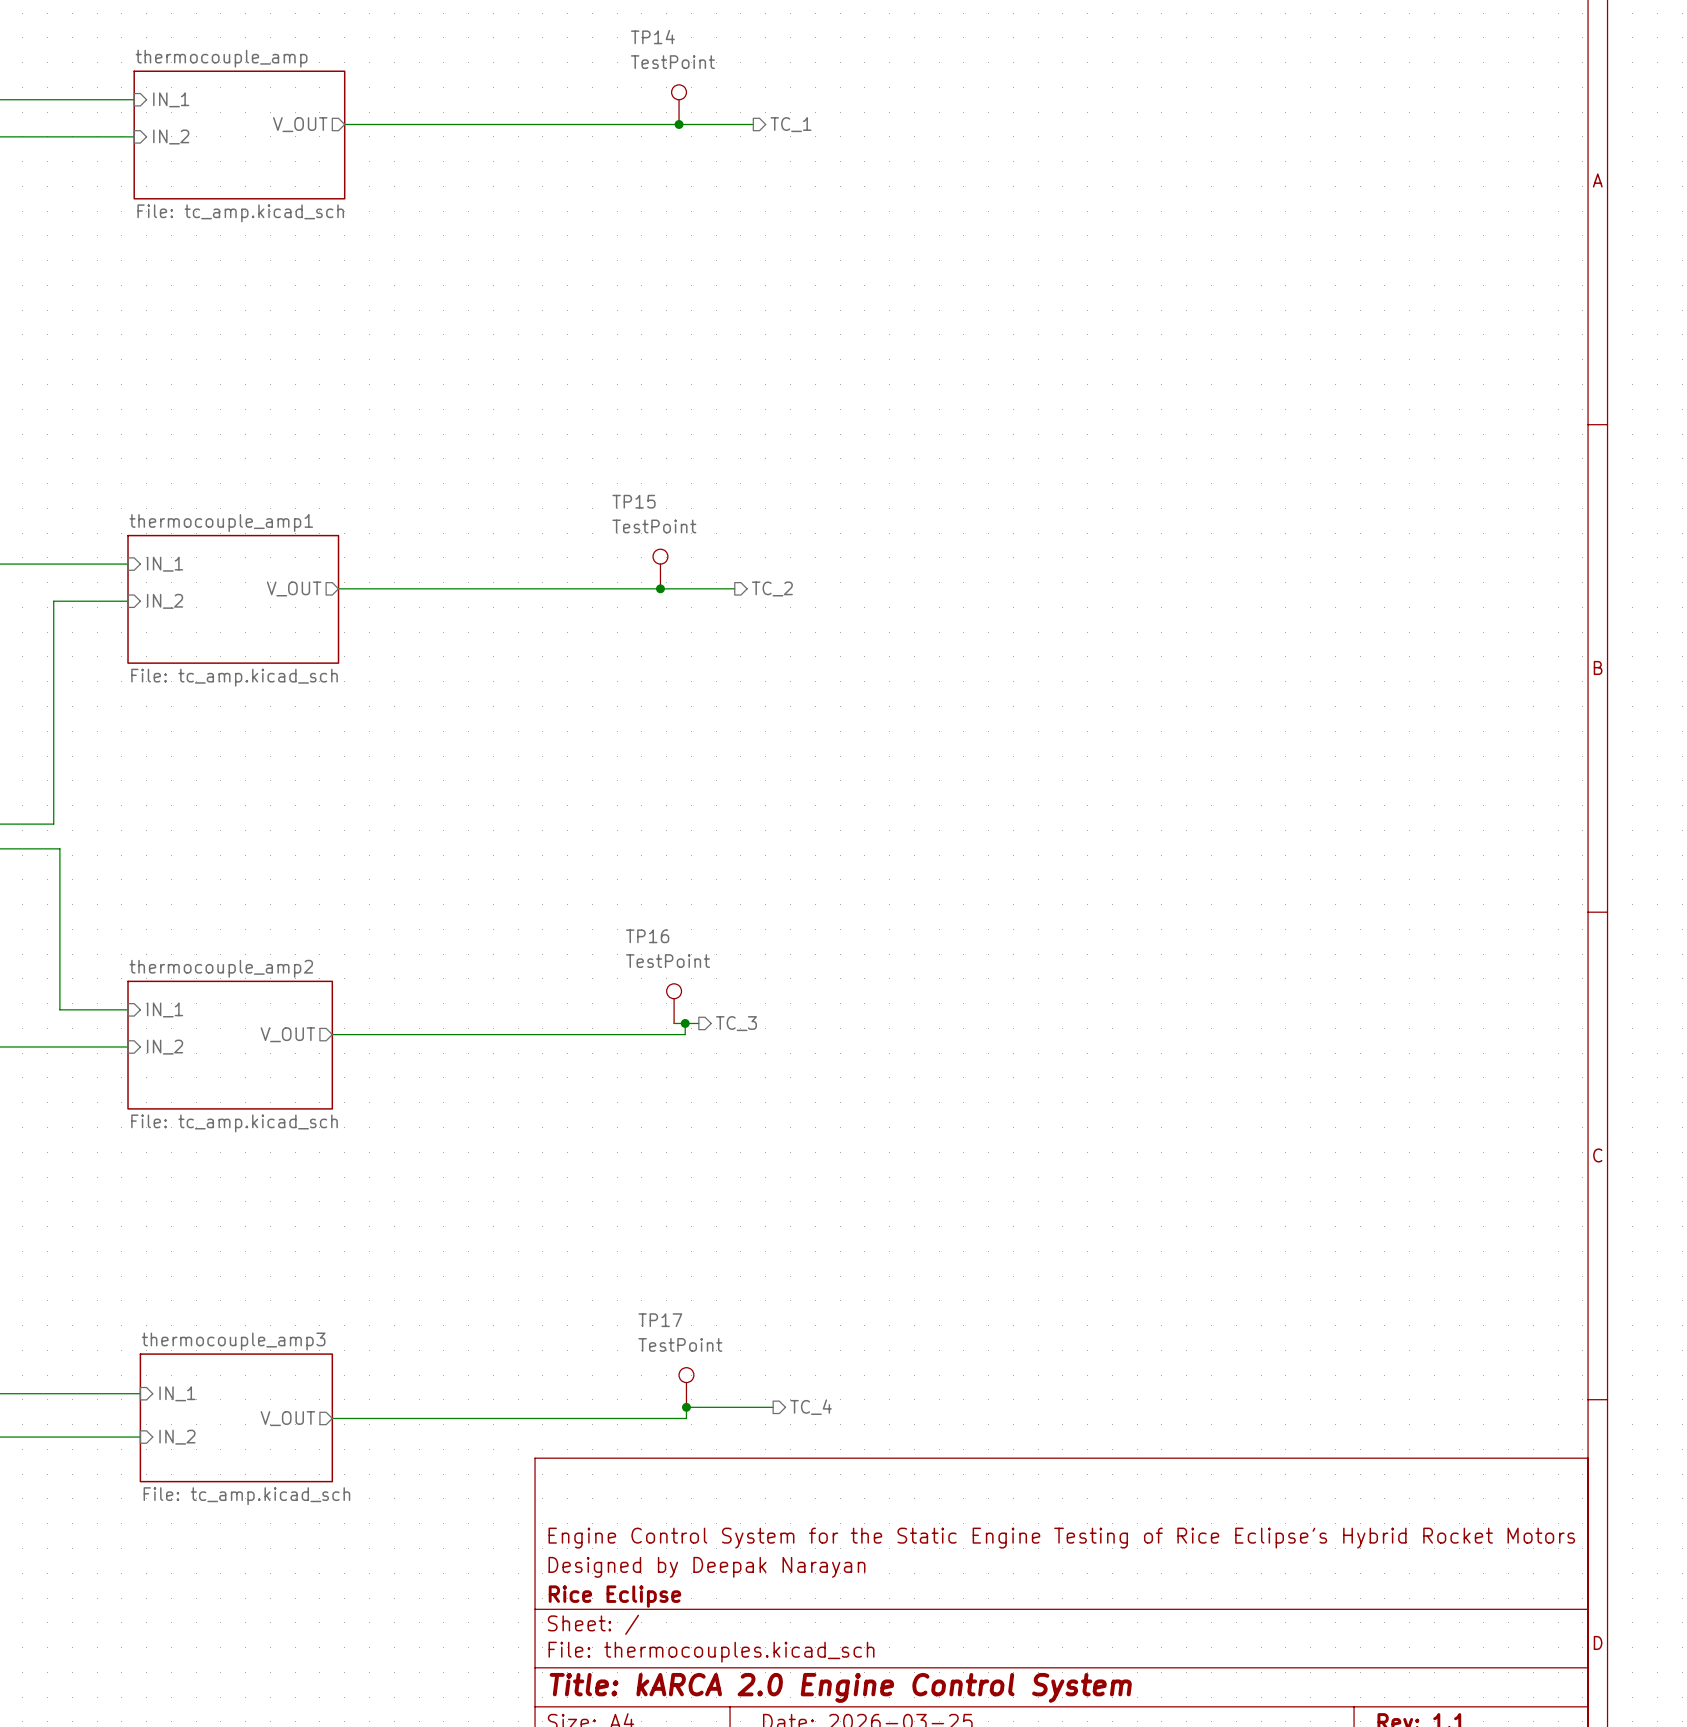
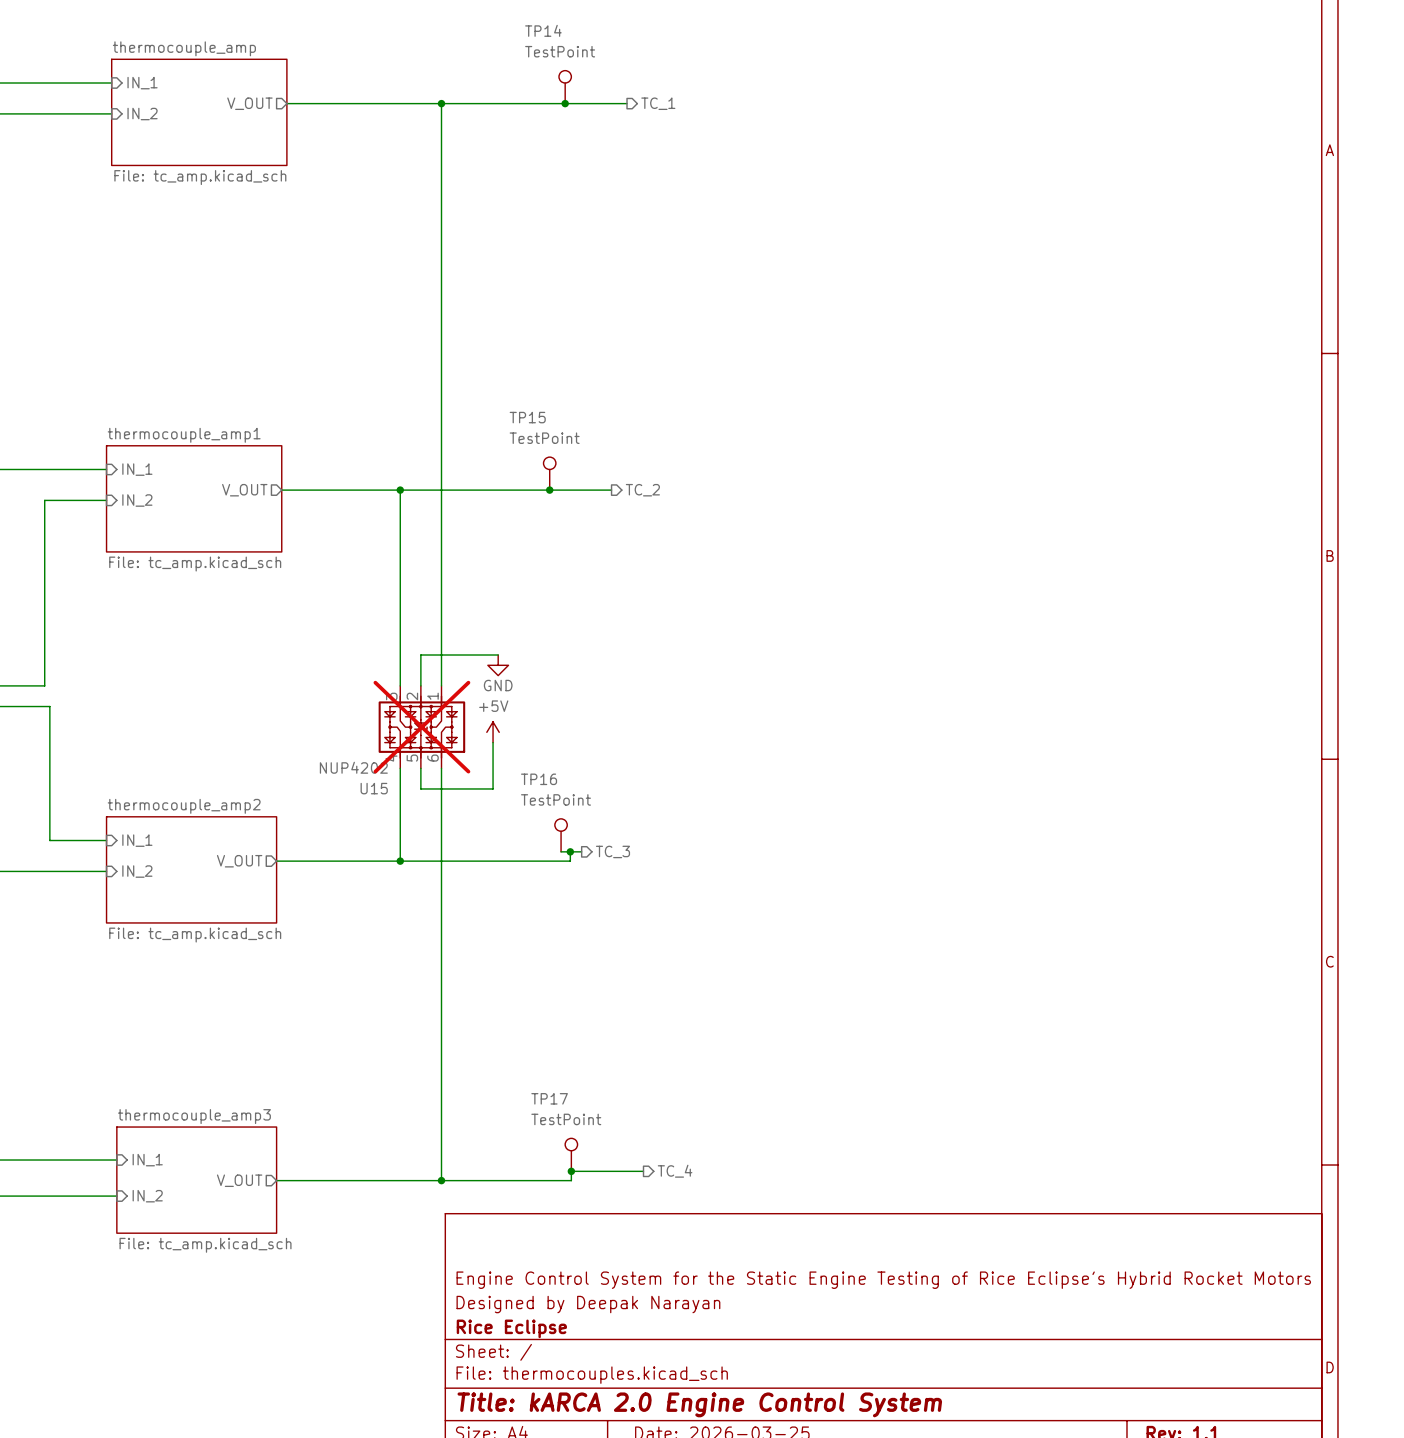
wire: none -> (441, 103) (441, 685)
junction: none -> (441, 103)
wire: none -> (400, 490) (400, 685)
junction: none -> (400, 490)
wire: none -> (498, 655) (420, 655) (420, 685)
power symbol: none -> GND (498, 665)
U15: none -> NUP4202 (421, 727)
power symbol: none -> +5V (493, 732)
wire: none -> (493, 742) (493, 788) (420, 788) (420, 768)
wire: none -> (400, 768) (400, 861)
wire: none -> (441, 768) (441, 1180)
junction: none -> (400, 861)
junction: none -> (441, 1180)

